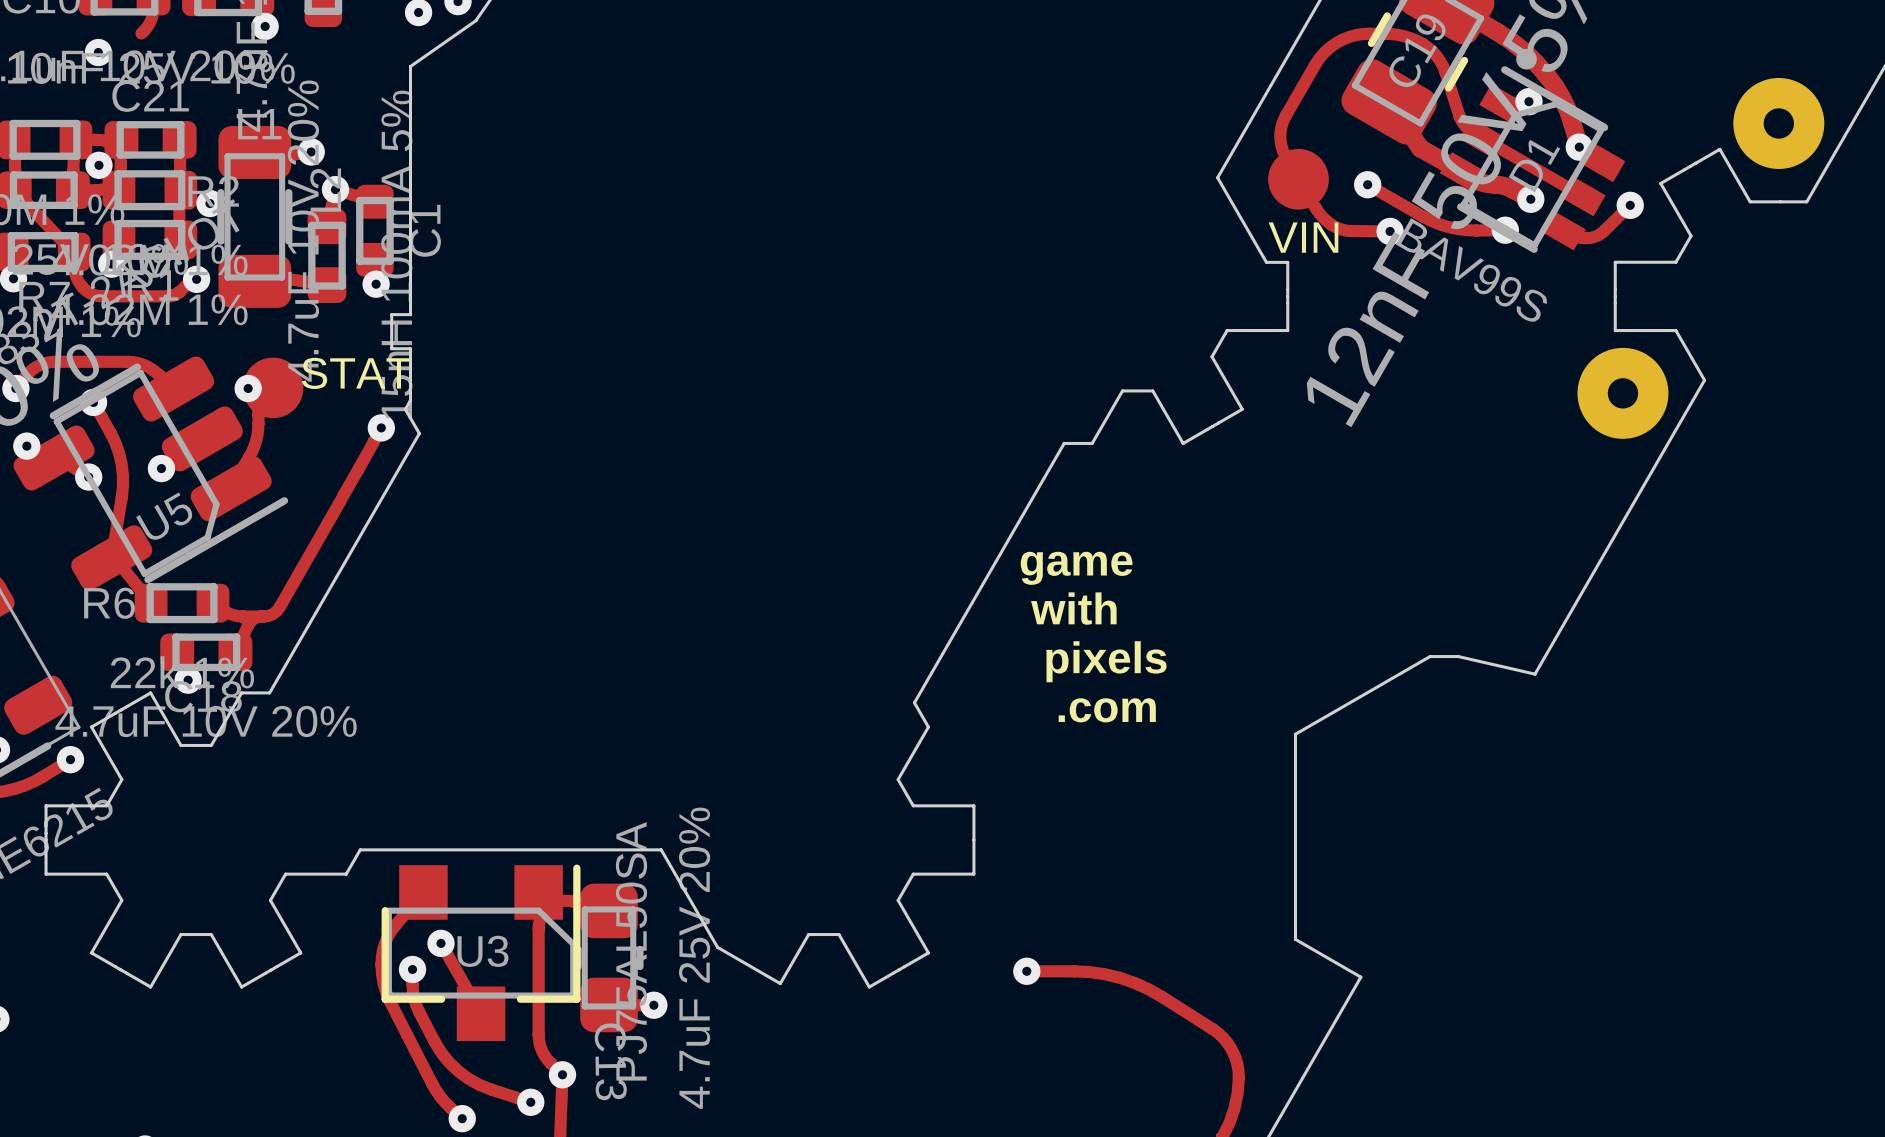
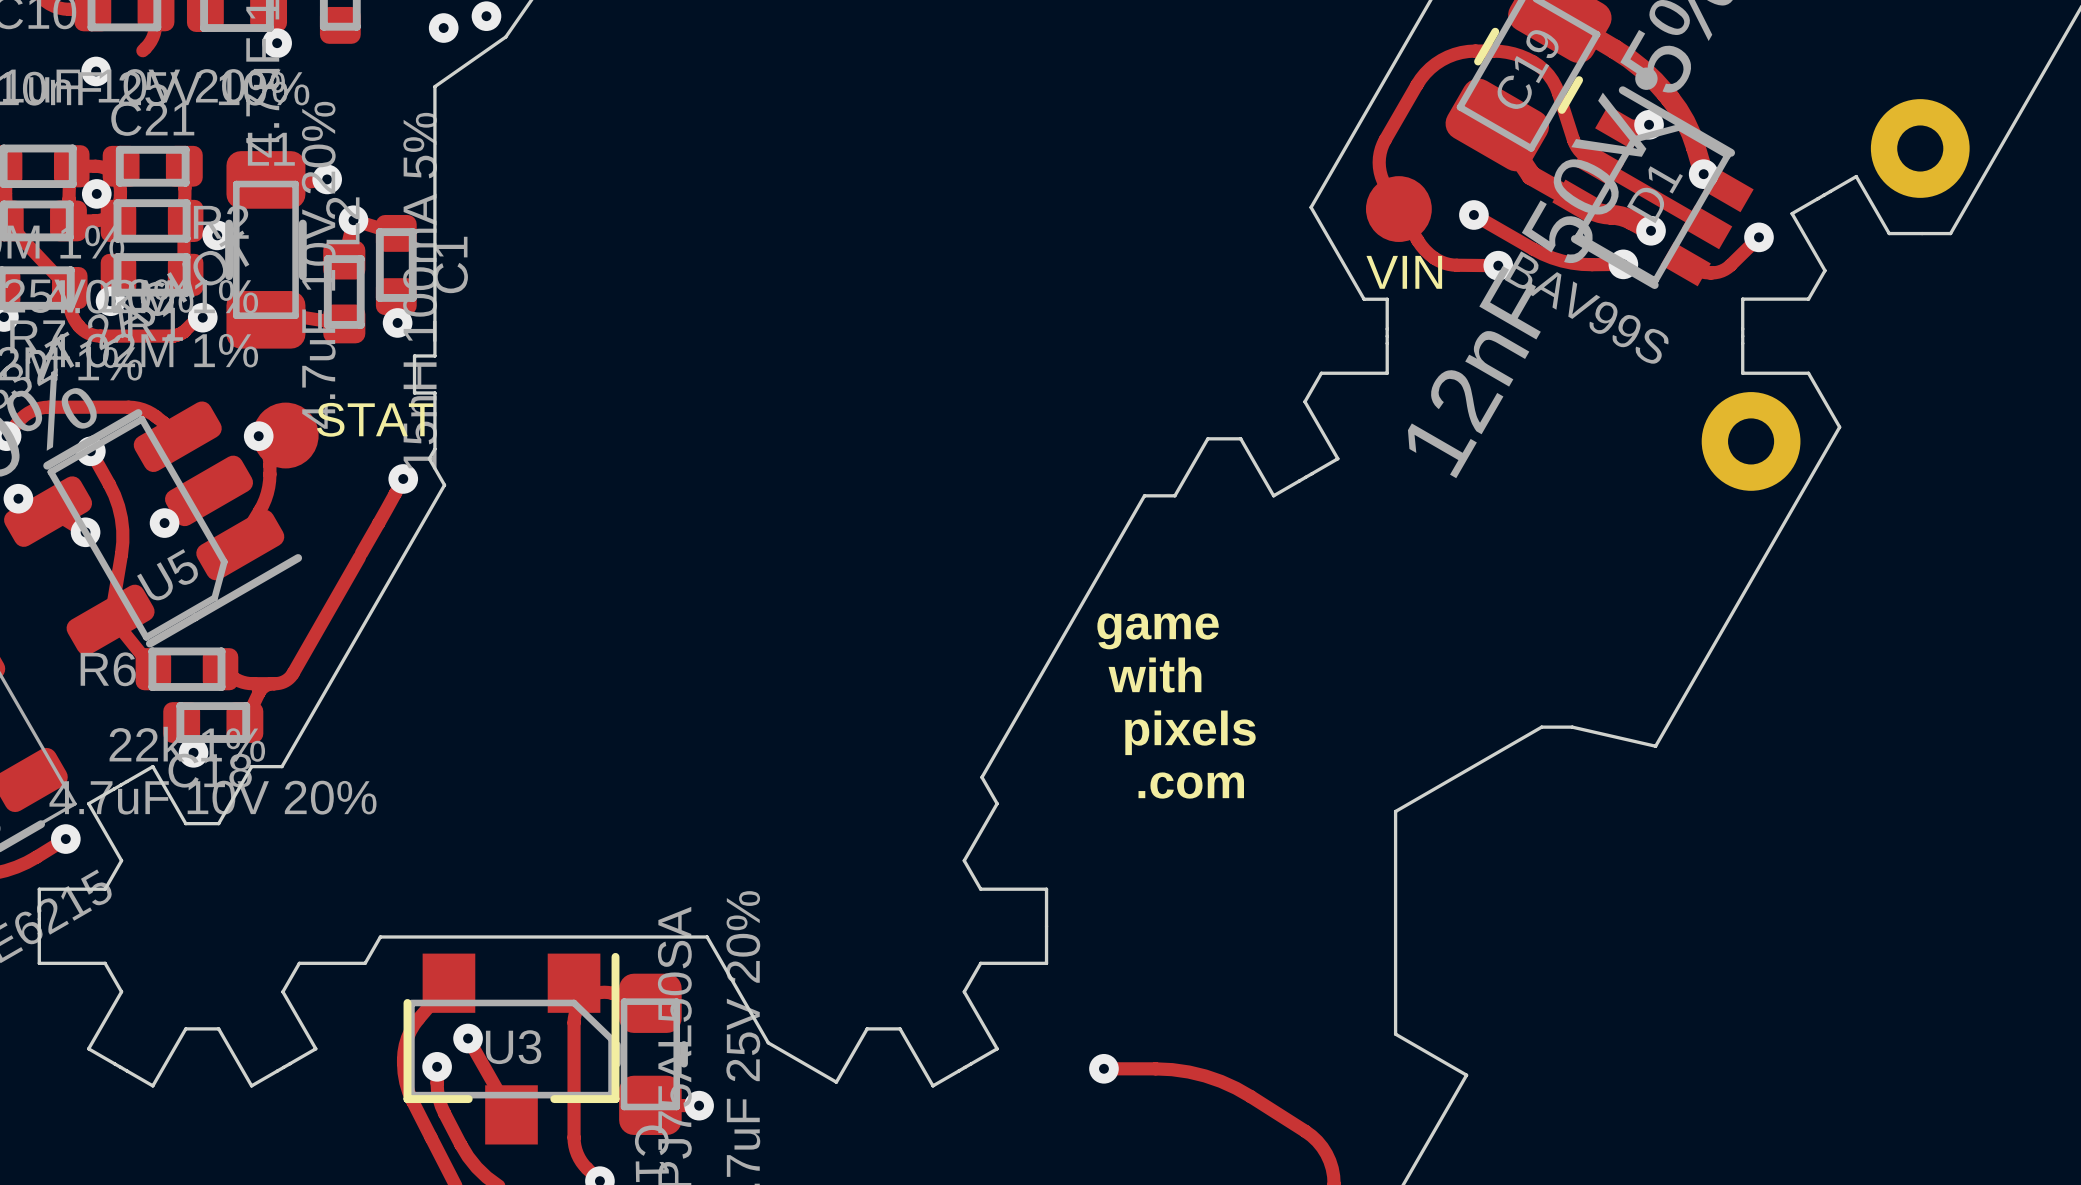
part footprint: [1733, 78, 1825, 169] -> [1870, 99, 1970, 198]
part footprint: [1577, 347, 1669, 439] -> [1701, 392, 1801, 491]

